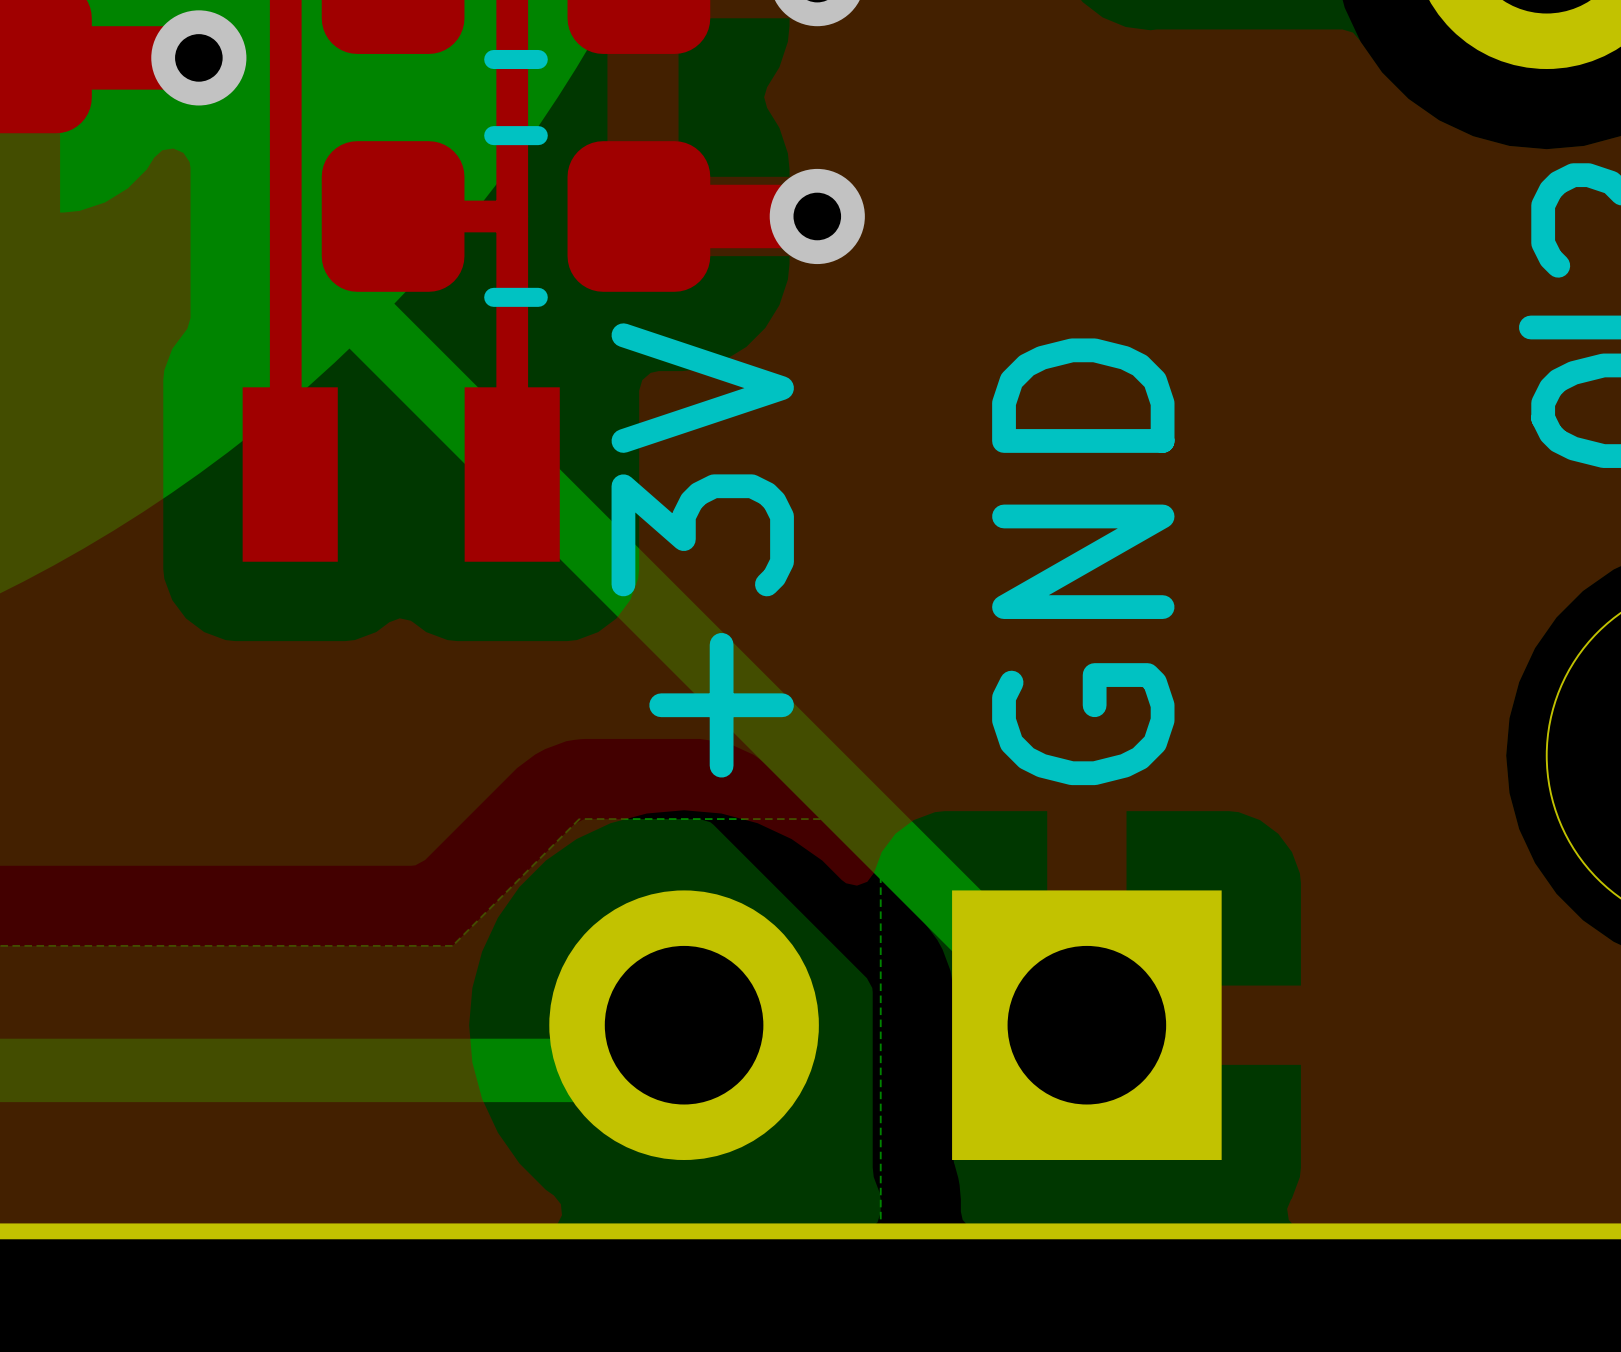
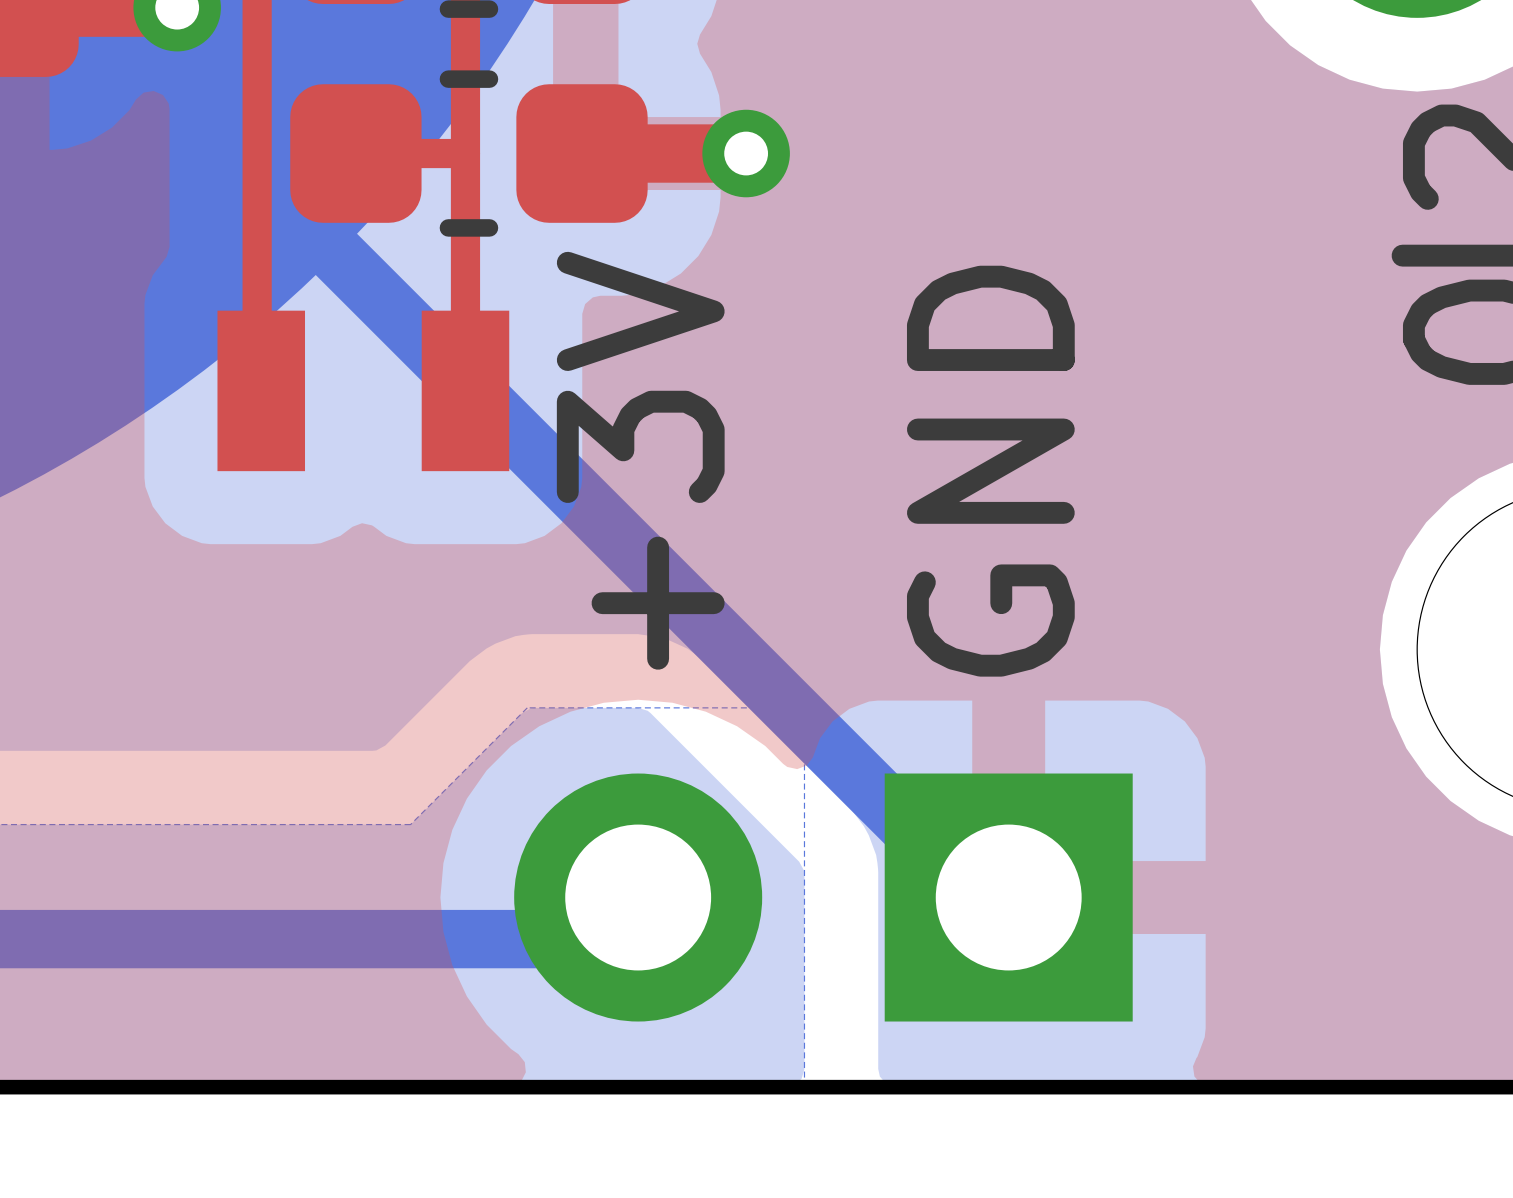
part position: (885, 1025) -> (823, 897)

